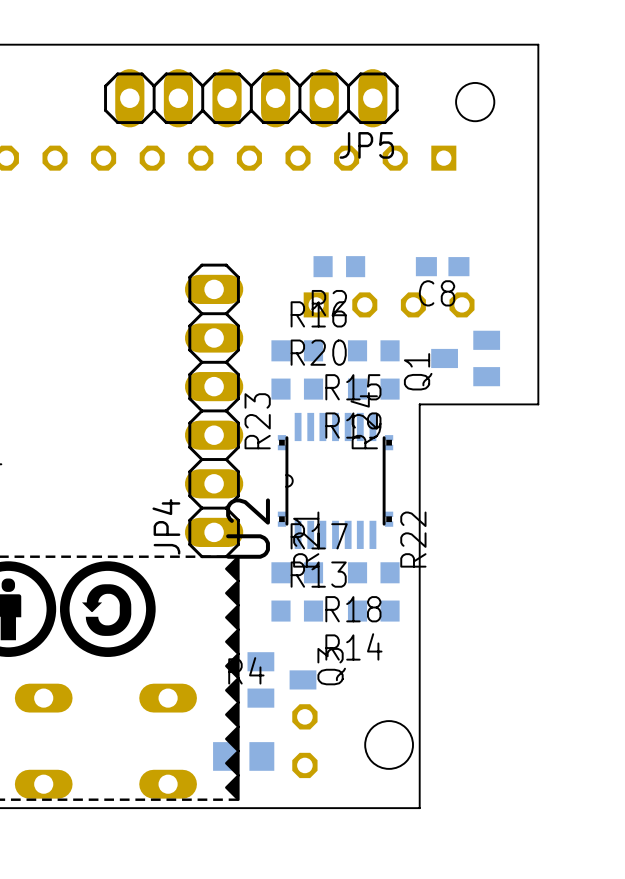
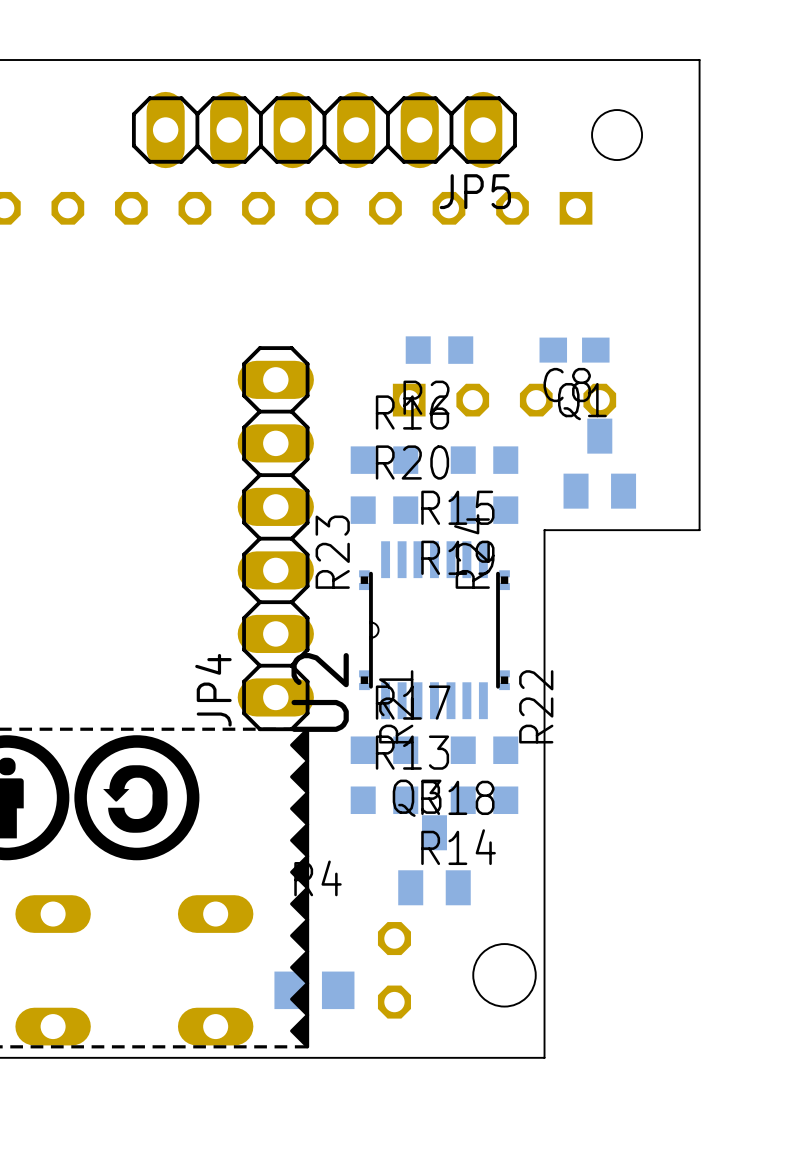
Q1 rotation: 0° (465, 358) -> 90° clockwise (599, 463)
Q3 rotation: 0° (281, 679) -> 90° counterclockwise (434, 860)
Q3 position: (281, 679) -> (434, 860)

